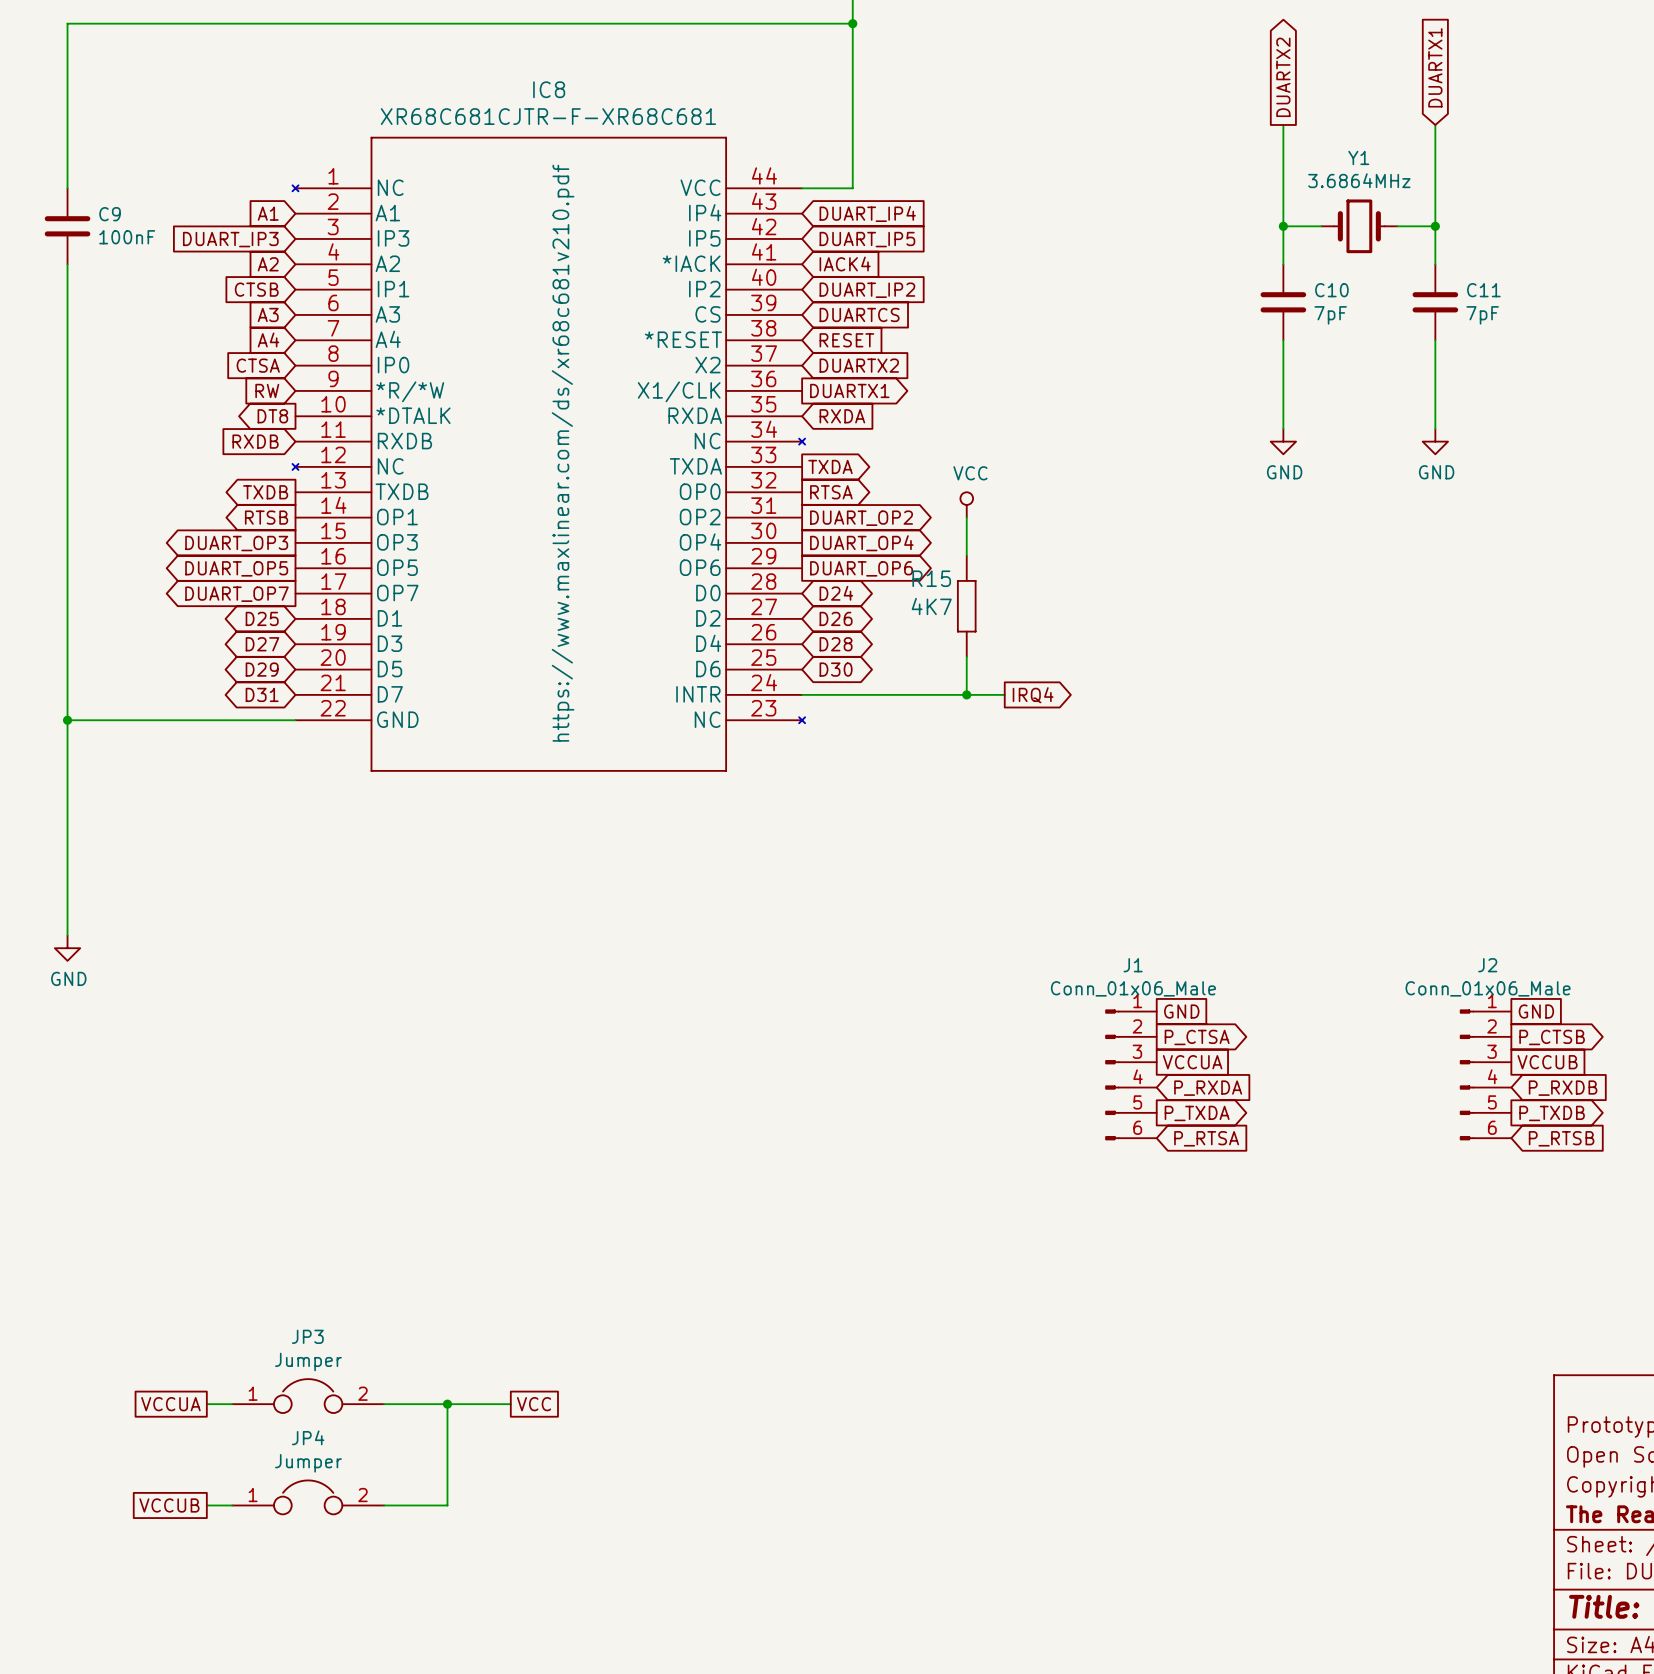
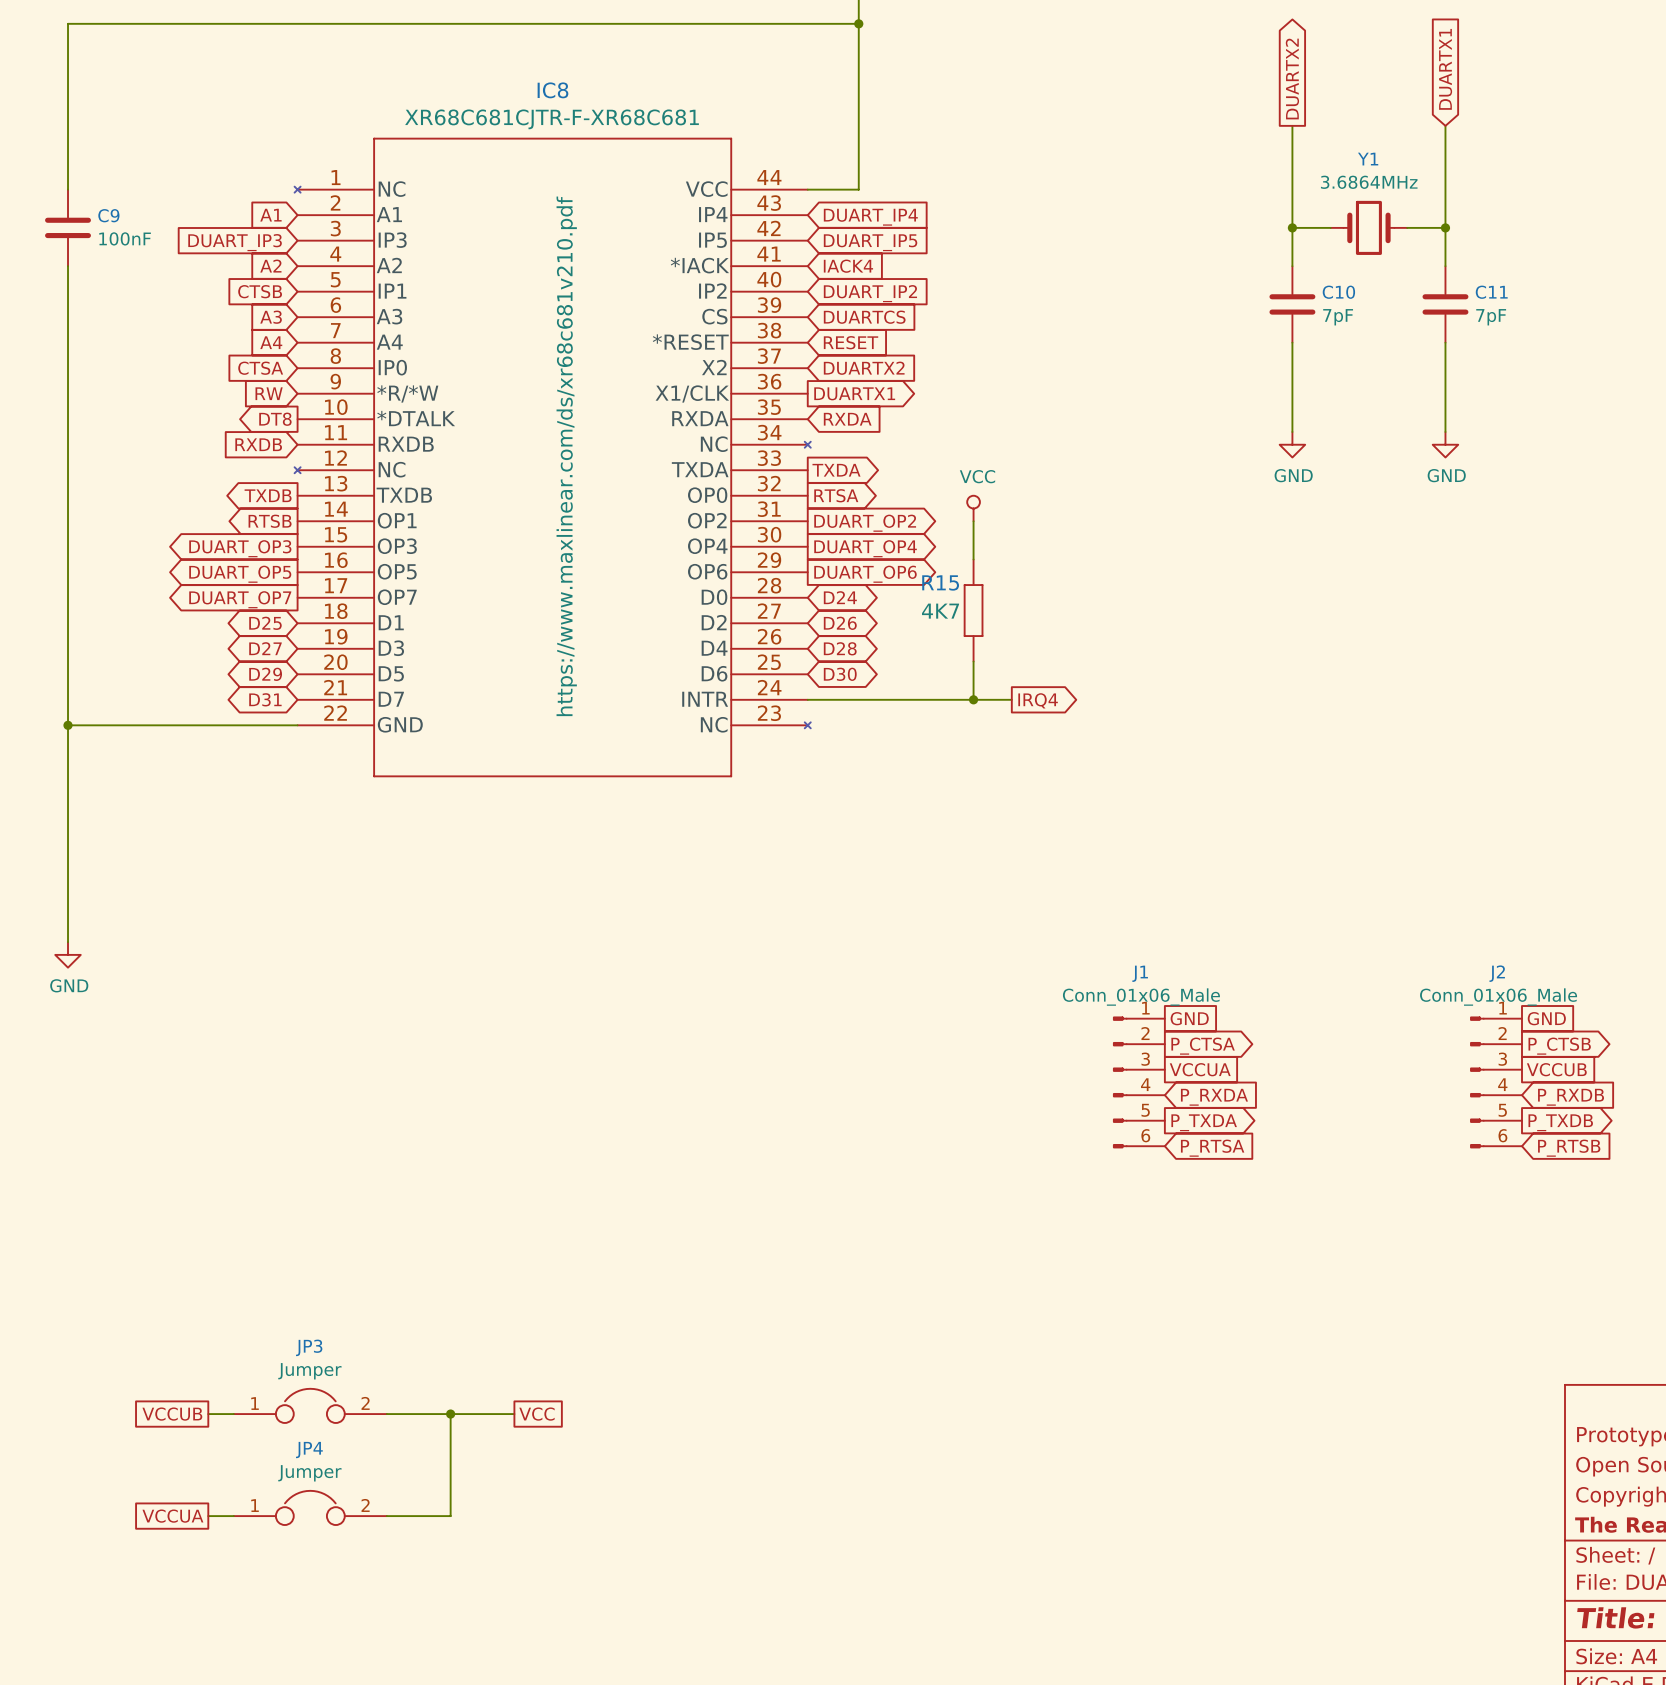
global label: VCCUA (170, 1404) -> VCCUB (172, 1414)
global label: VCCUB (169, 1505) -> VCCUA (172, 1516)

